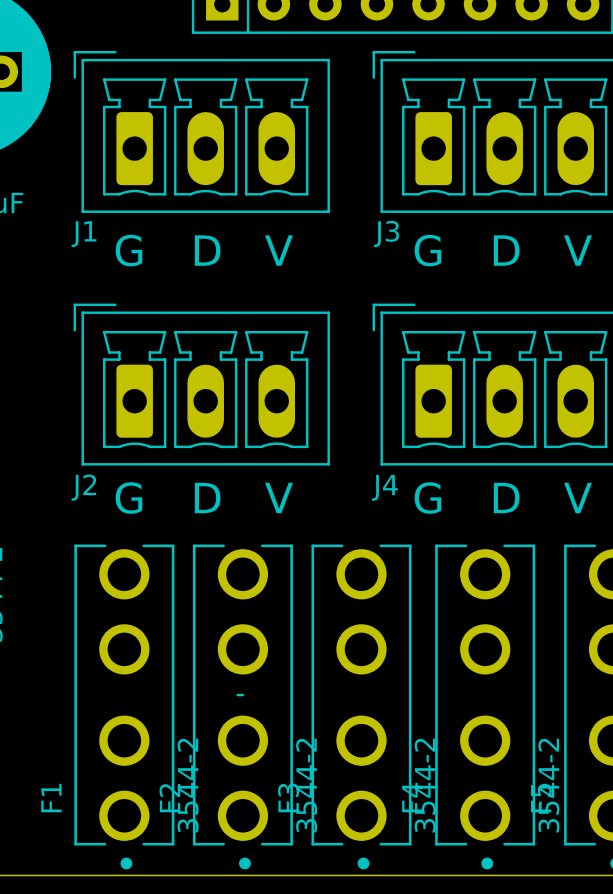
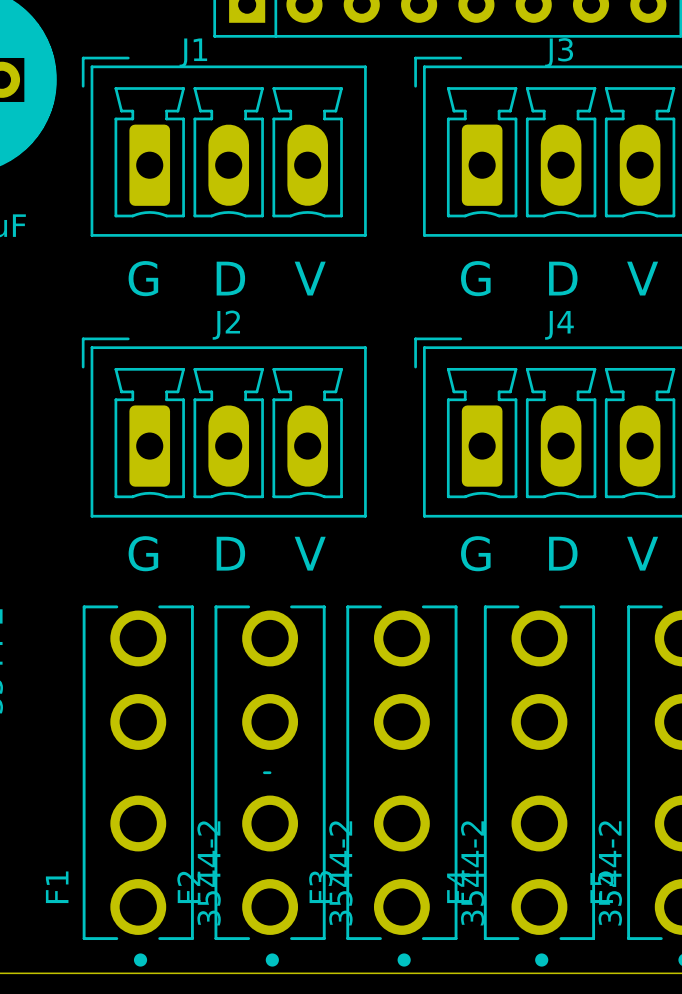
J3 name position: J3 (386, 233) -> J3 (559, 52)
J1 name position: J1 (84, 234) -> J1 (193, 52)
J2 name position: J2 (83, 487) -> J2 (226, 325)
J4 name position: J4 (384, 487) -> J4 (559, 325)

